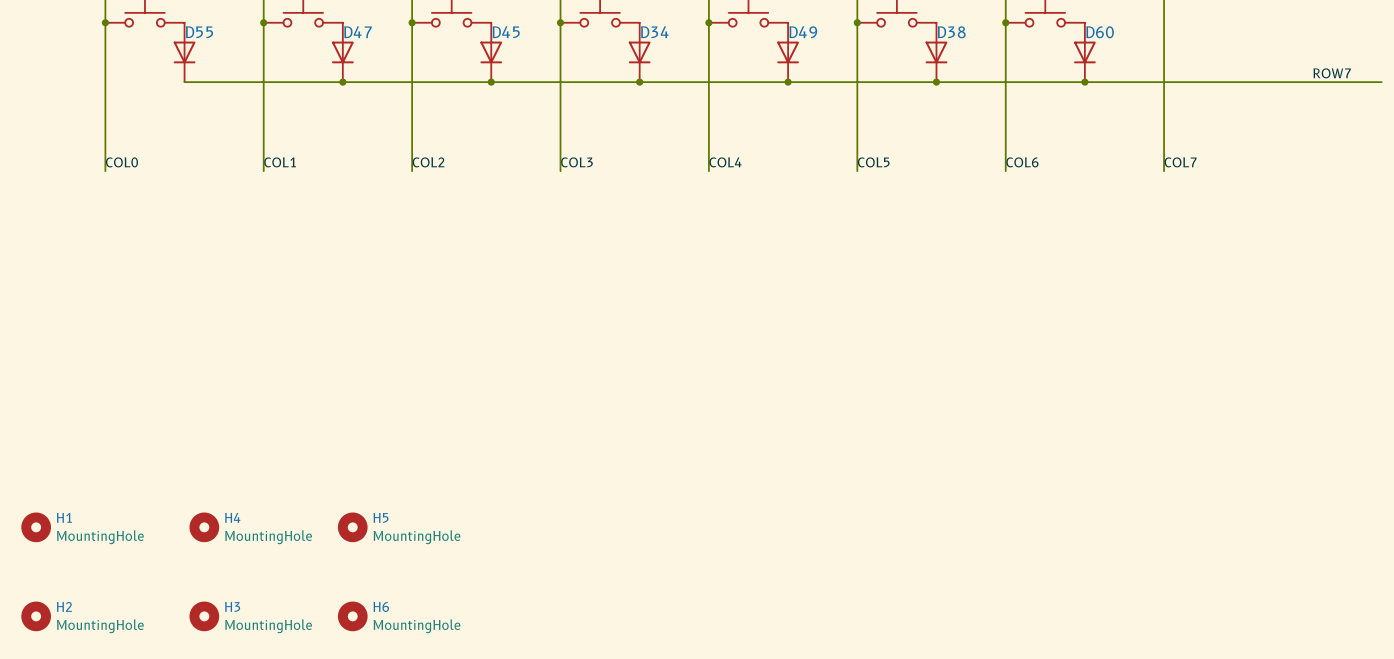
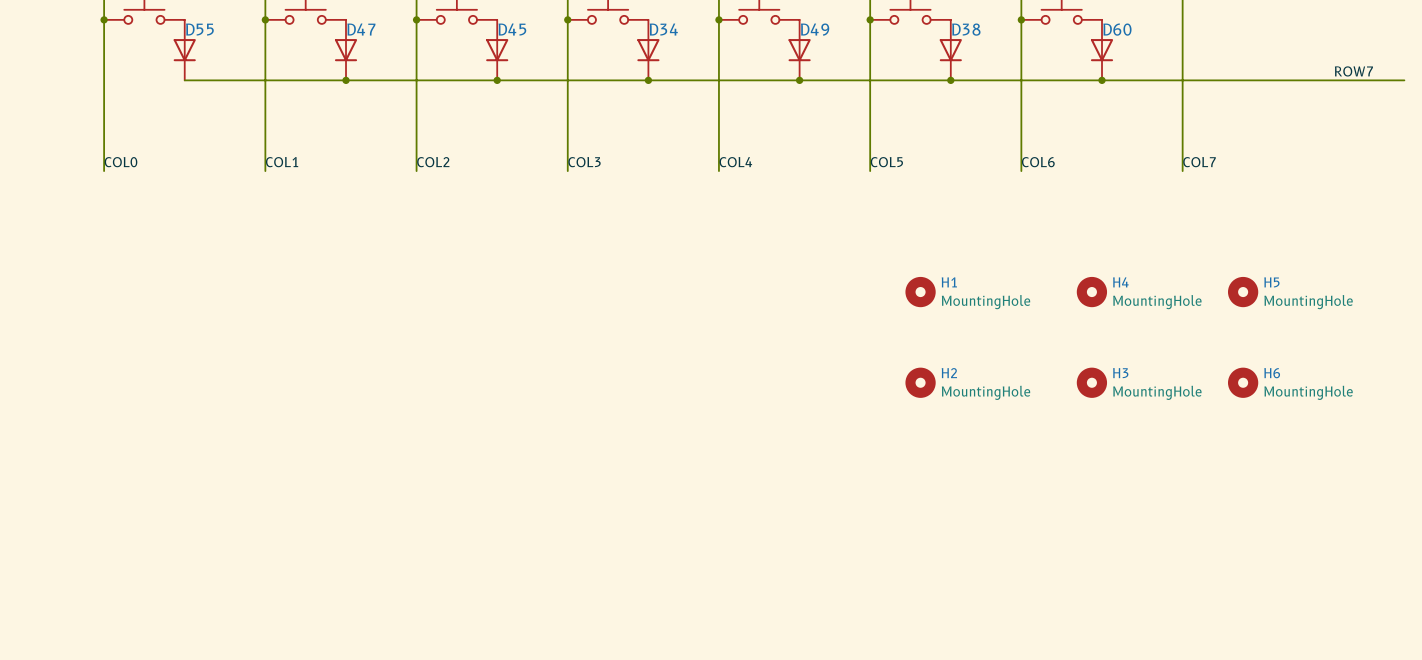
H1 position: (36, 527) -> (920, 292)
H4 position: (204, 527) -> (1091, 292)
H5 position: (352, 527) -> (1243, 292)
H2 position: (36, 616) -> (920, 382)
H3 position: (204, 616) -> (1091, 382)
H6 position: (352, 616) -> (1243, 382)

